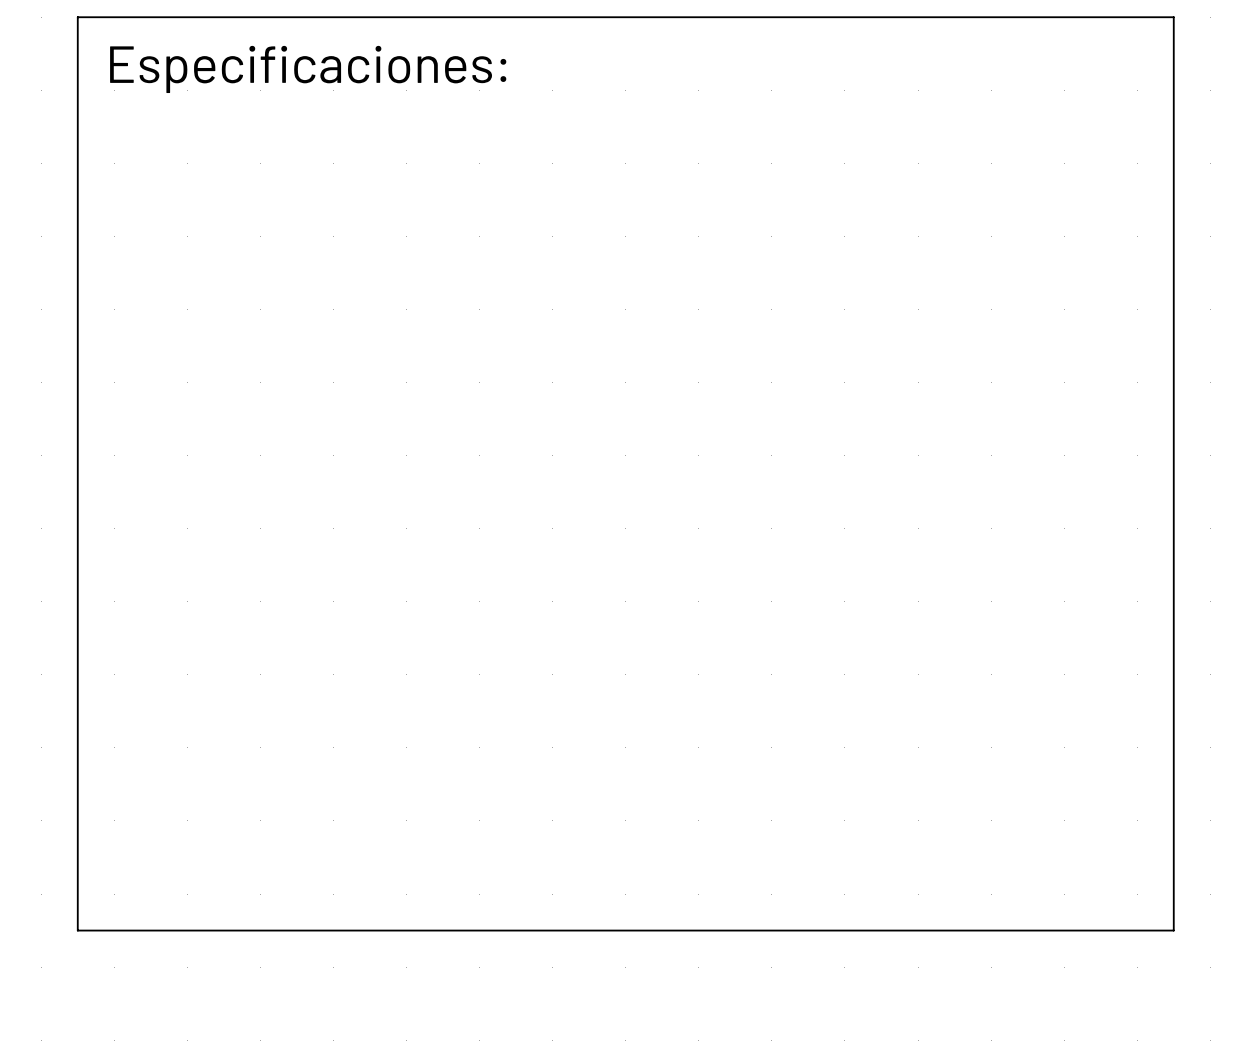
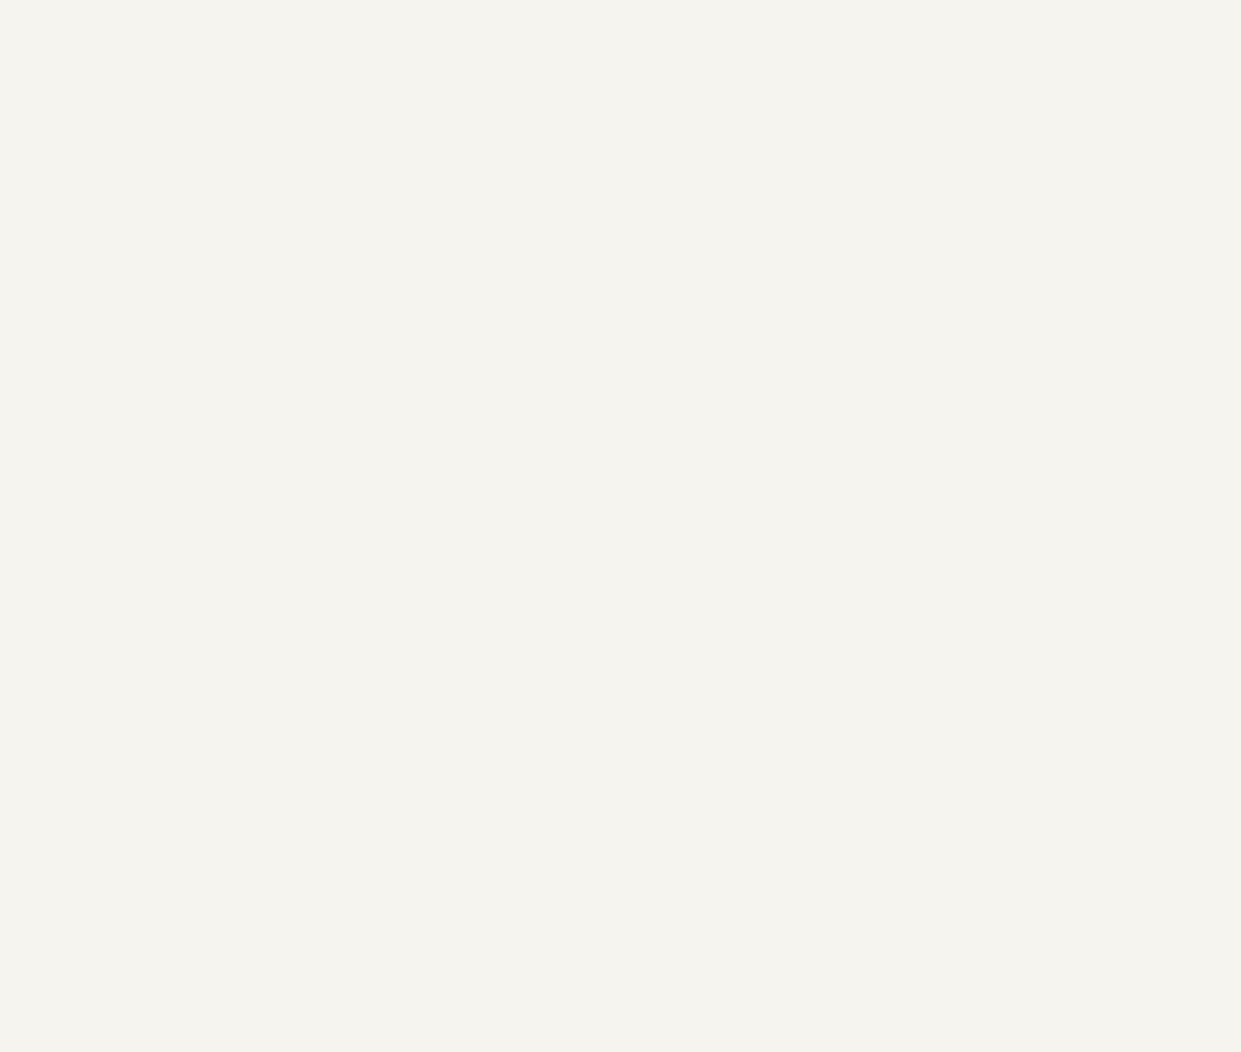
line: (77, 17) (77, 930) (1173, 930) (1173, 17) (77, 17) -> none
text: Especificaciones: (308, 69) -> none

